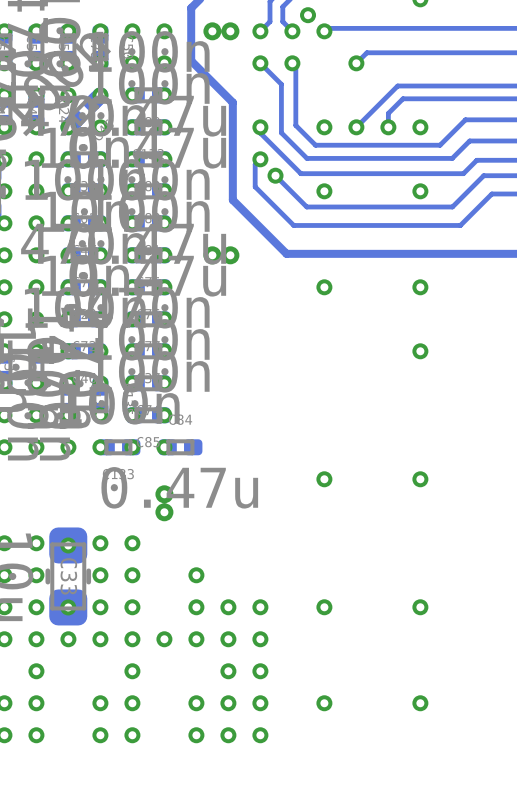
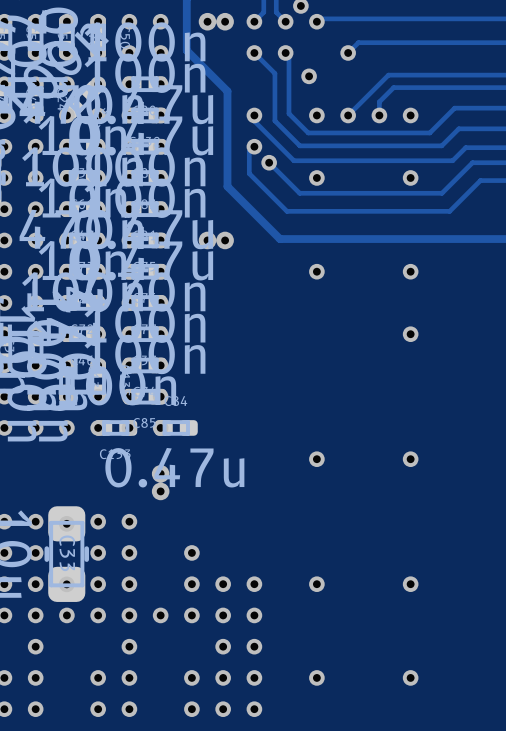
via: none -> (309, 76)

